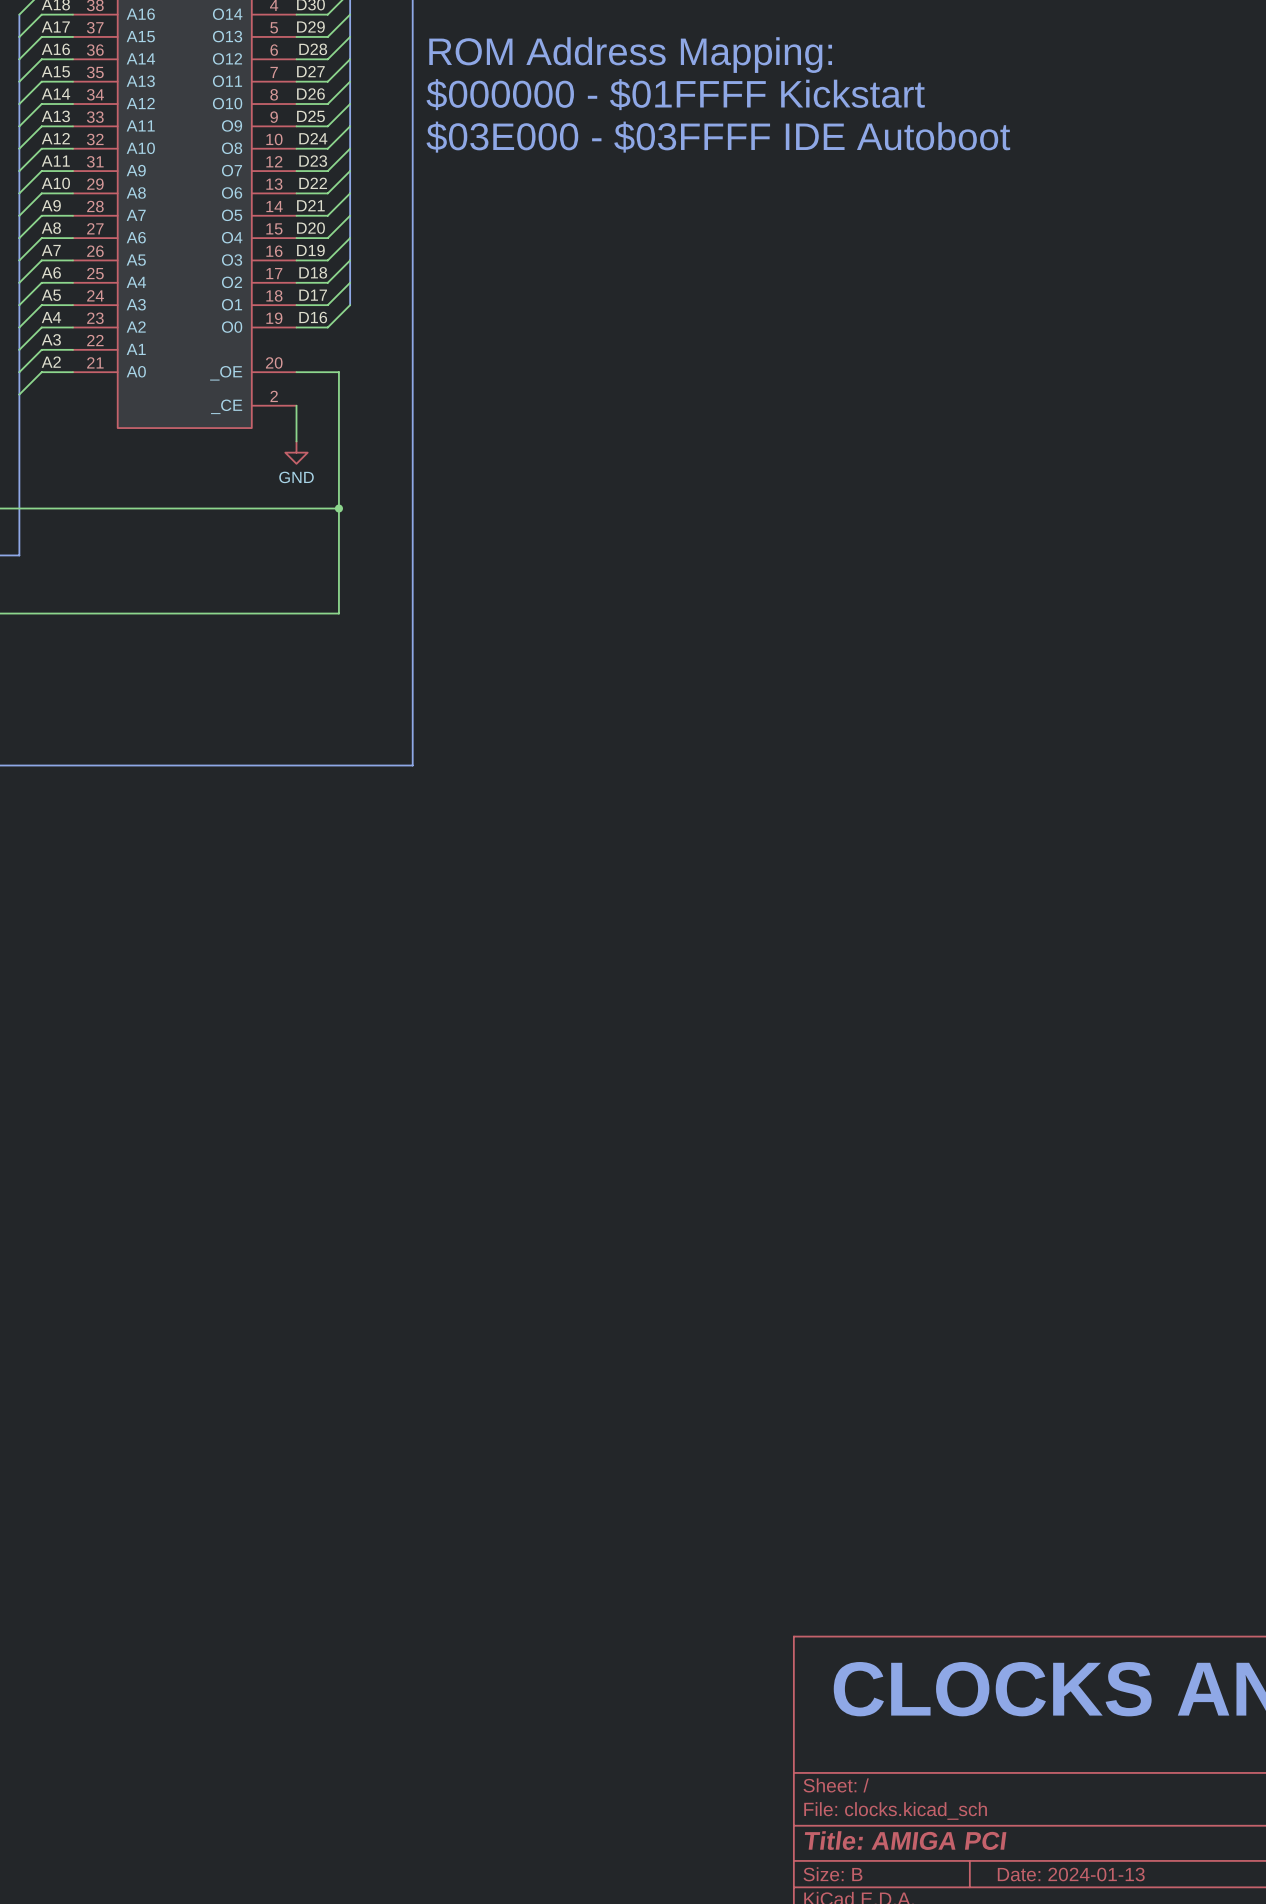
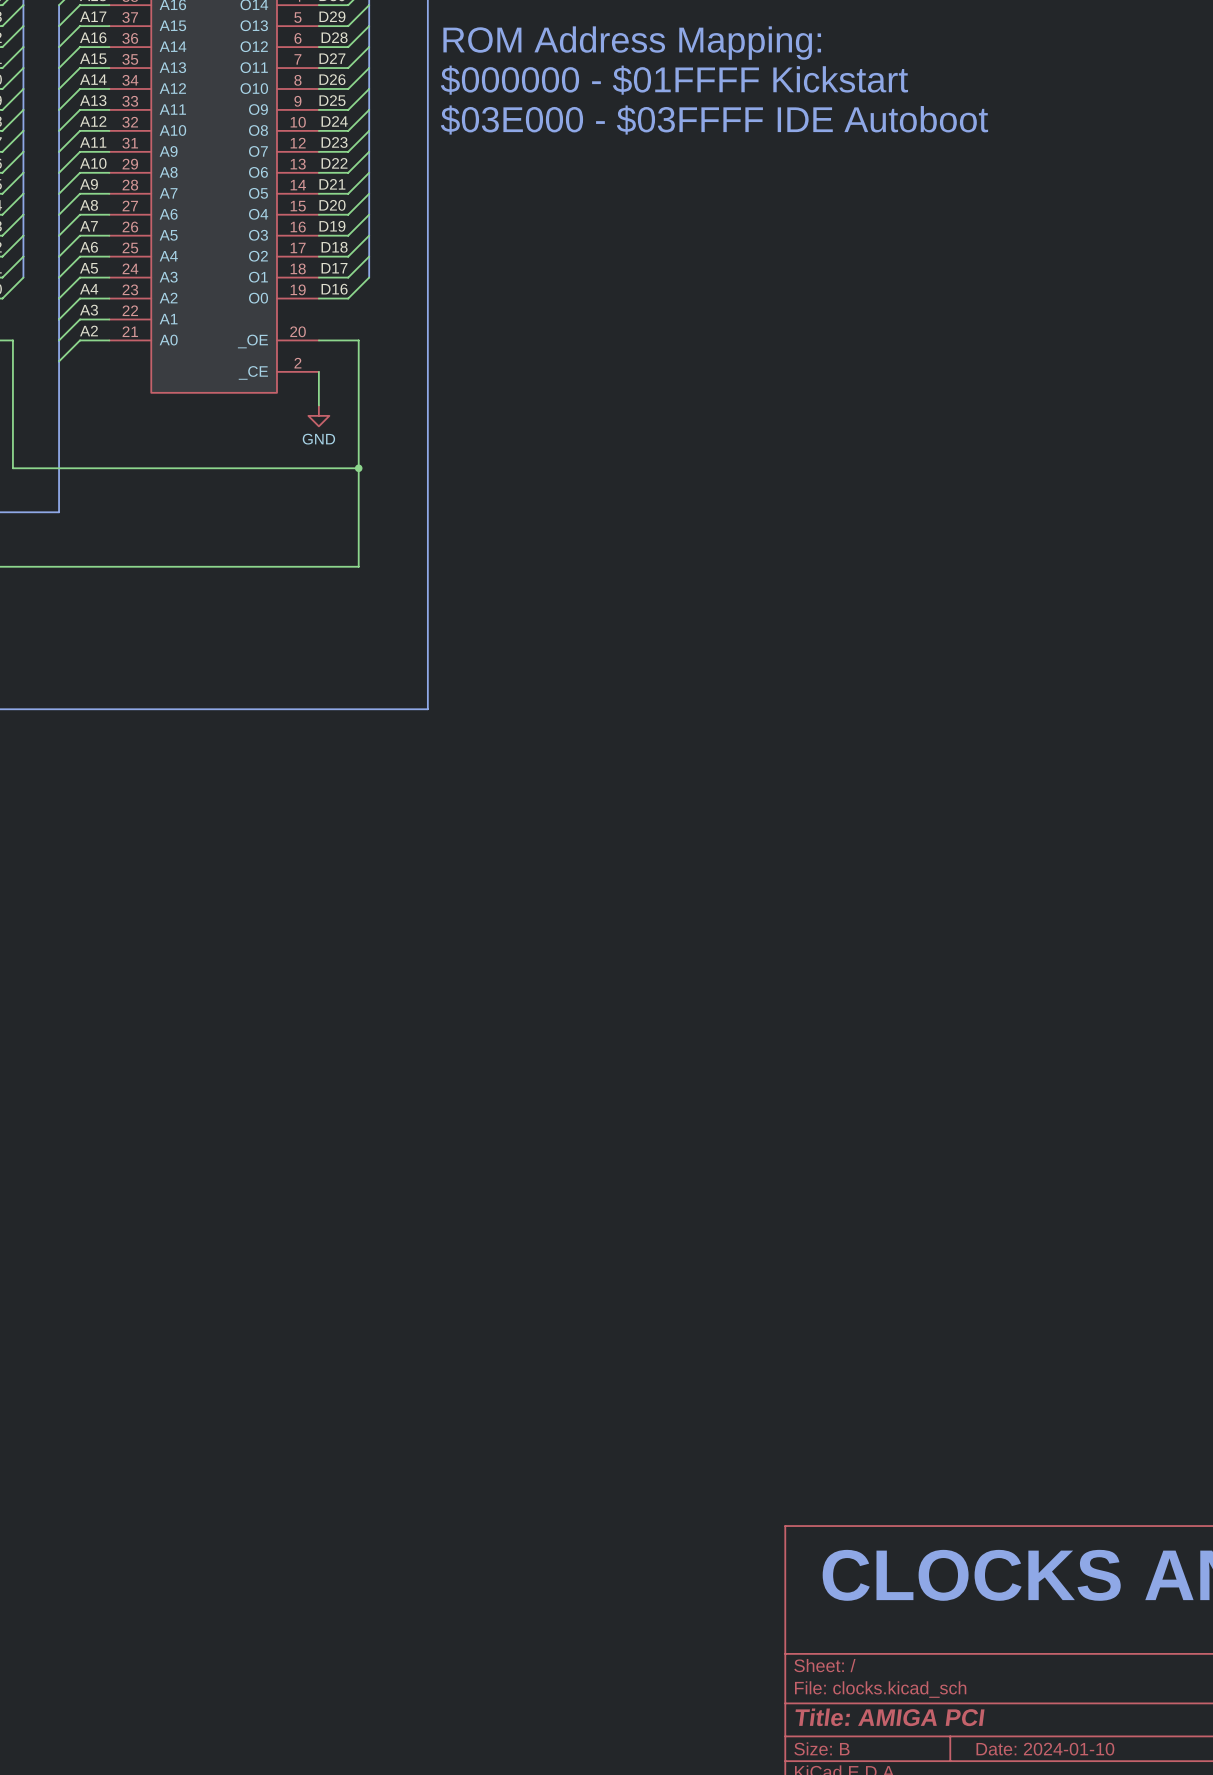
title block: Date: 2024-01-13 (1071, 1874) -> Date: 2024-01-10 (1045, 1749)

